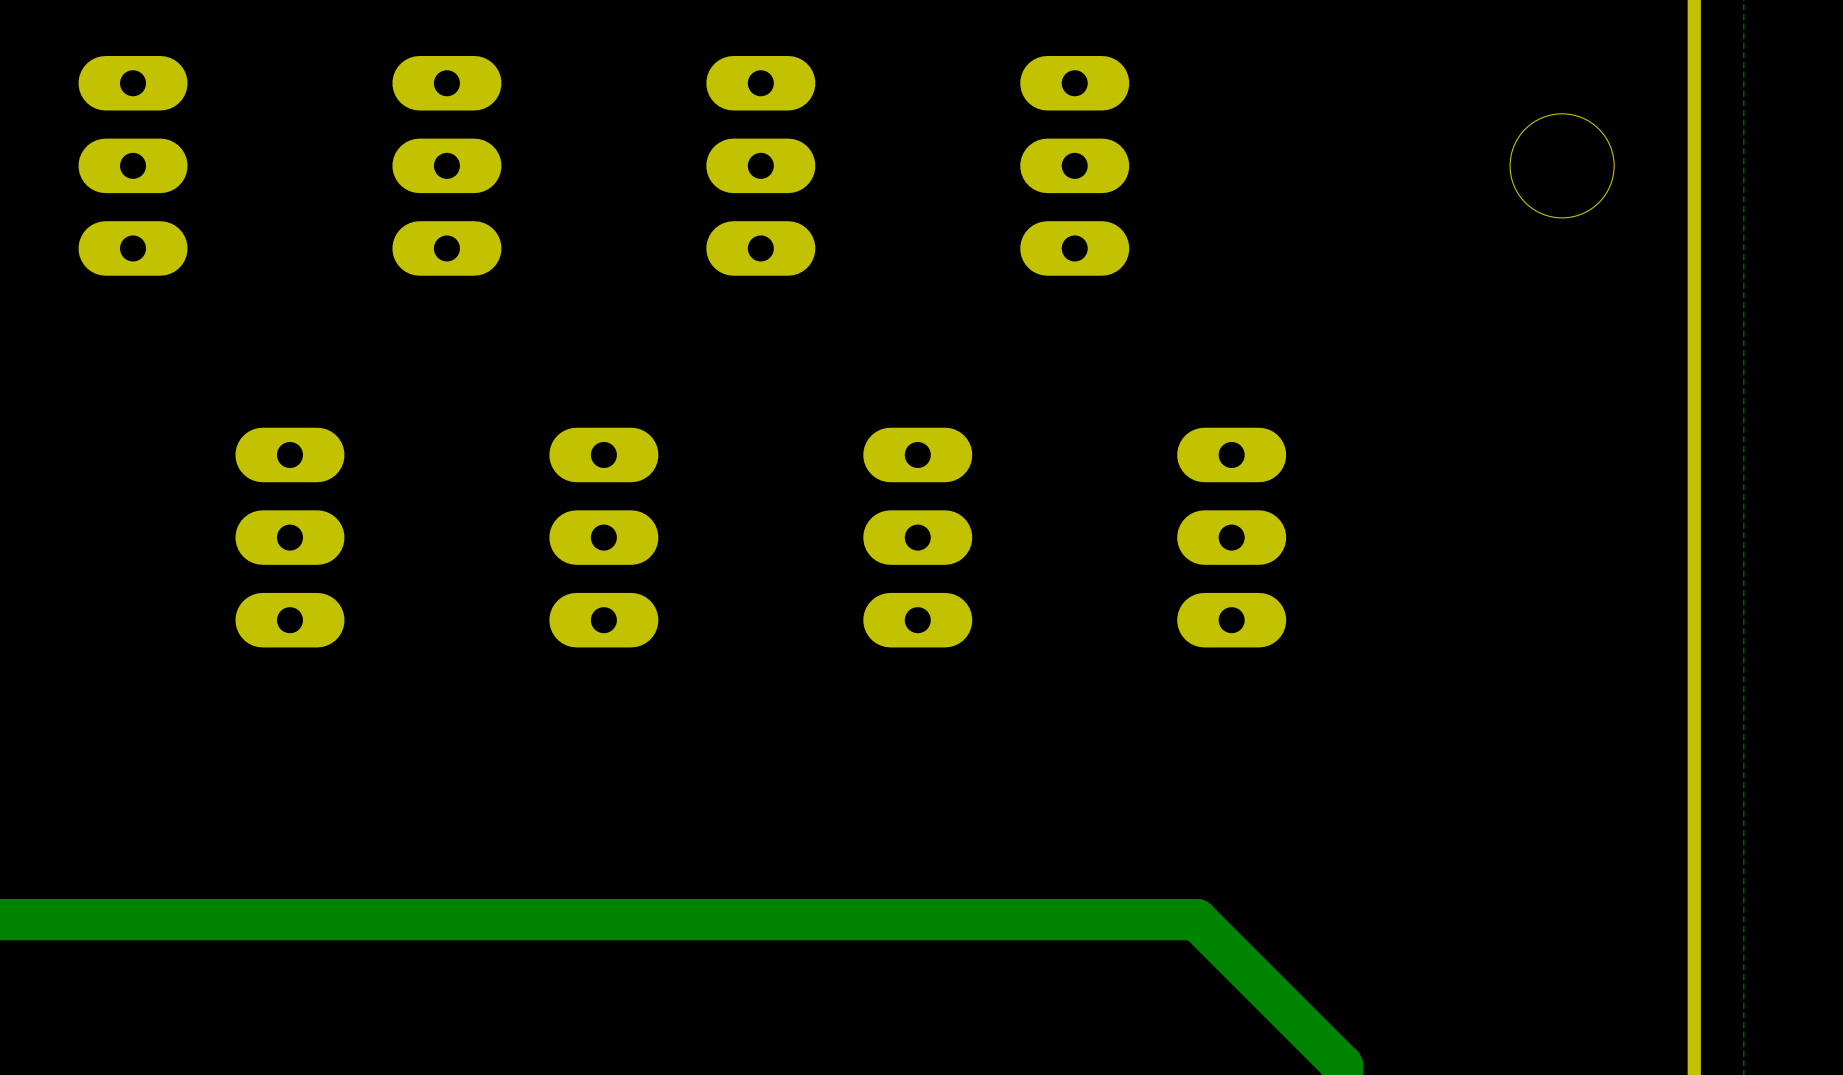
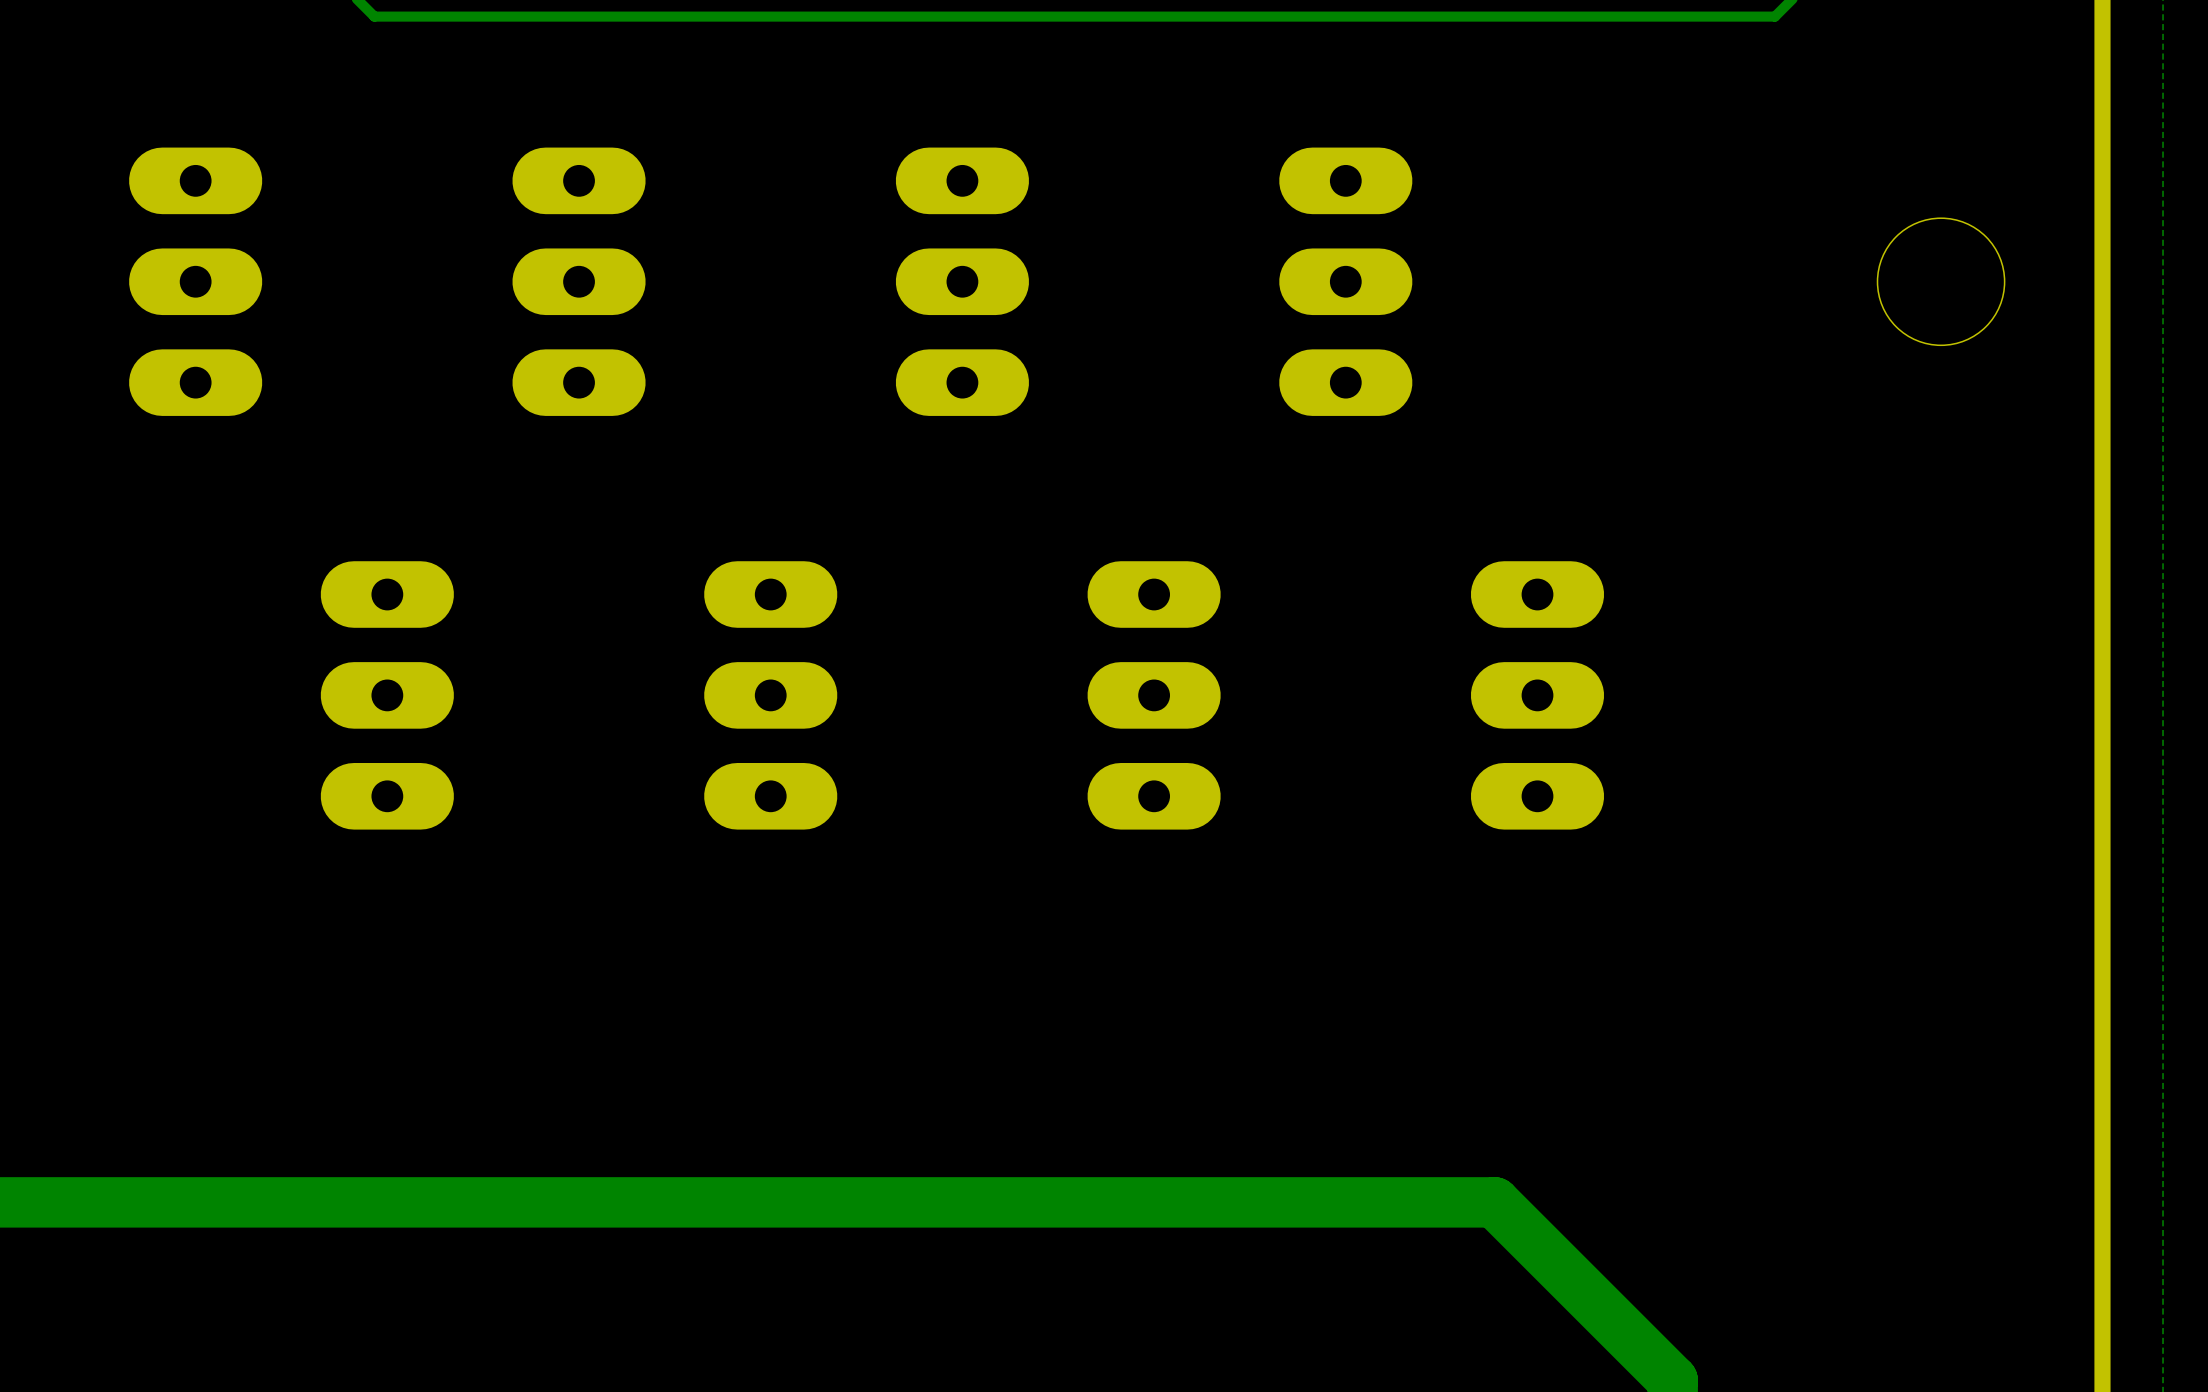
part position: (289, 537) -> (387, 695)
part position: (603, 537) -> (770, 695)
part position: (917, 537) -> (1154, 695)
part position: (1231, 537) -> (1537, 695)

